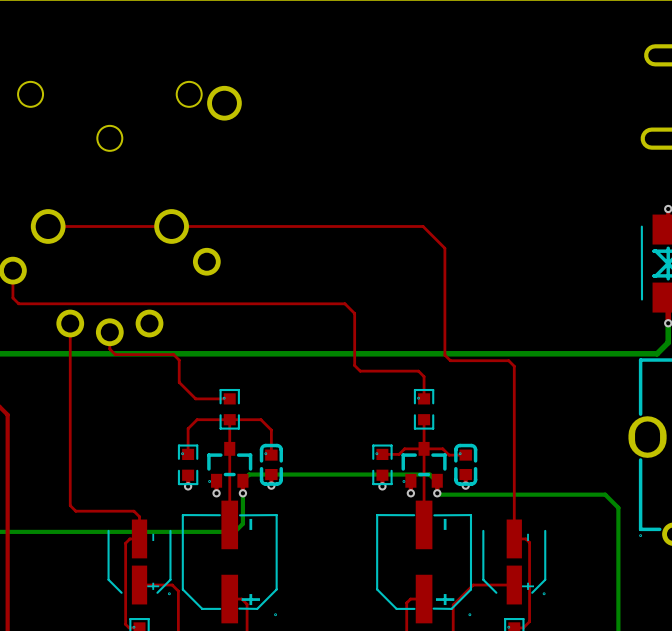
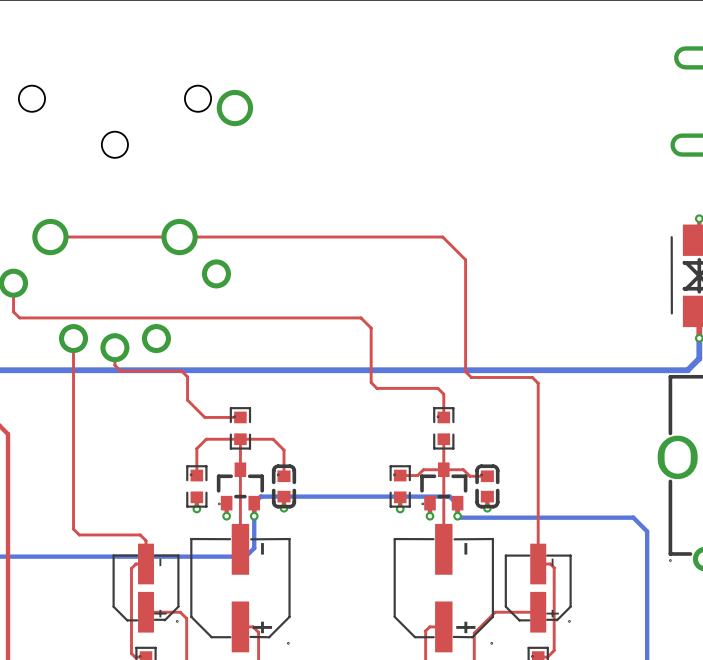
part footprint: [107, 519, 172, 605] -> [112, 543, 180, 633]
part footprint: [482, 519, 547, 605] -> [504, 543, 572, 633]

